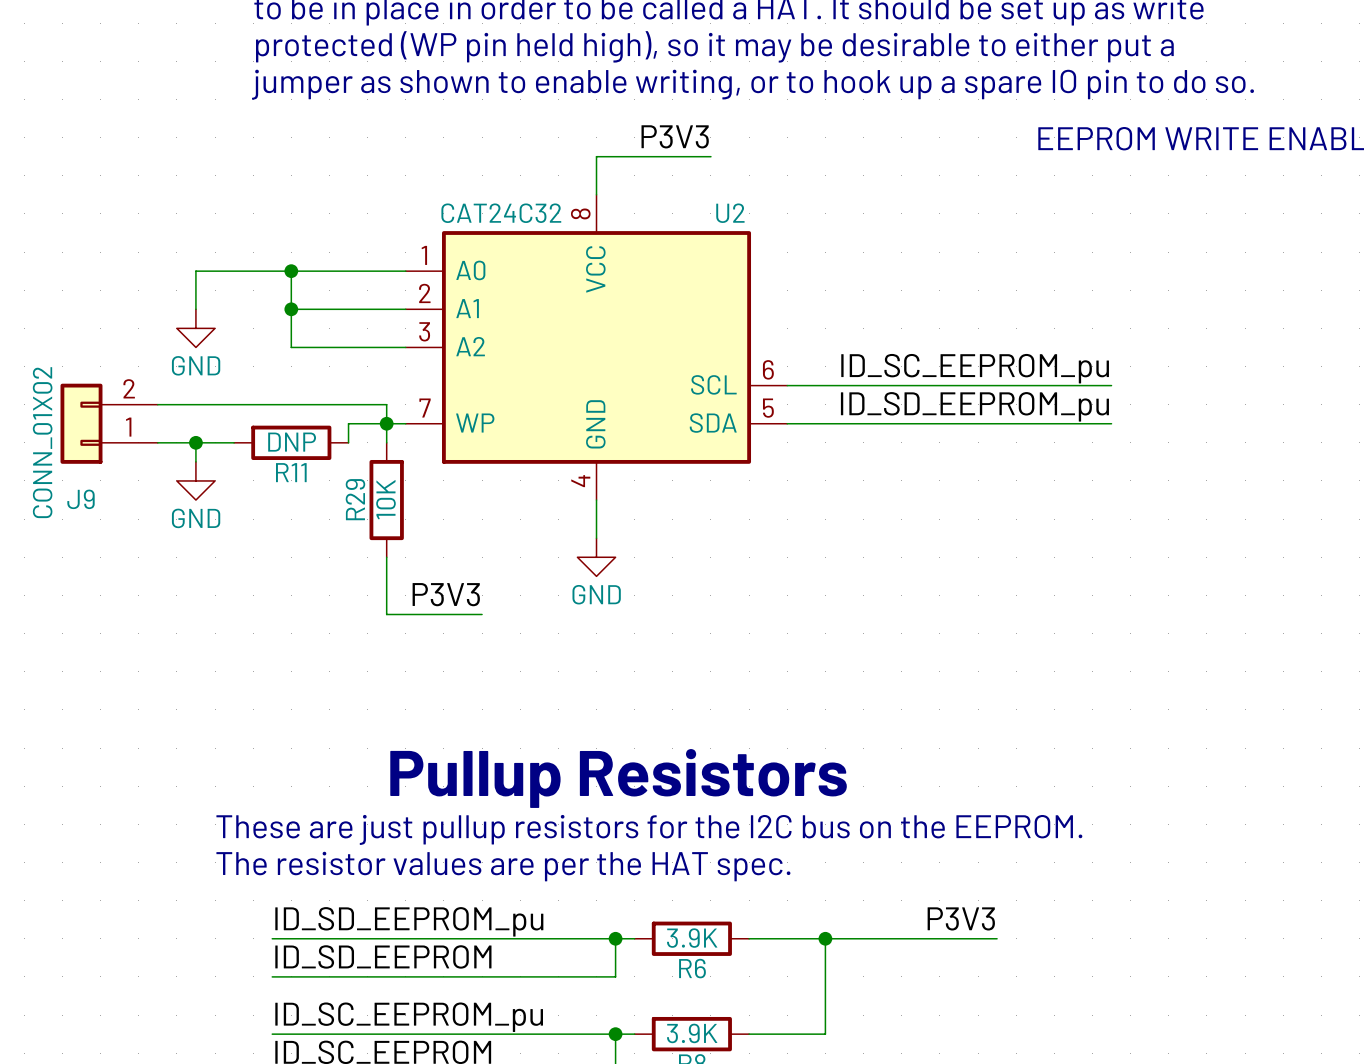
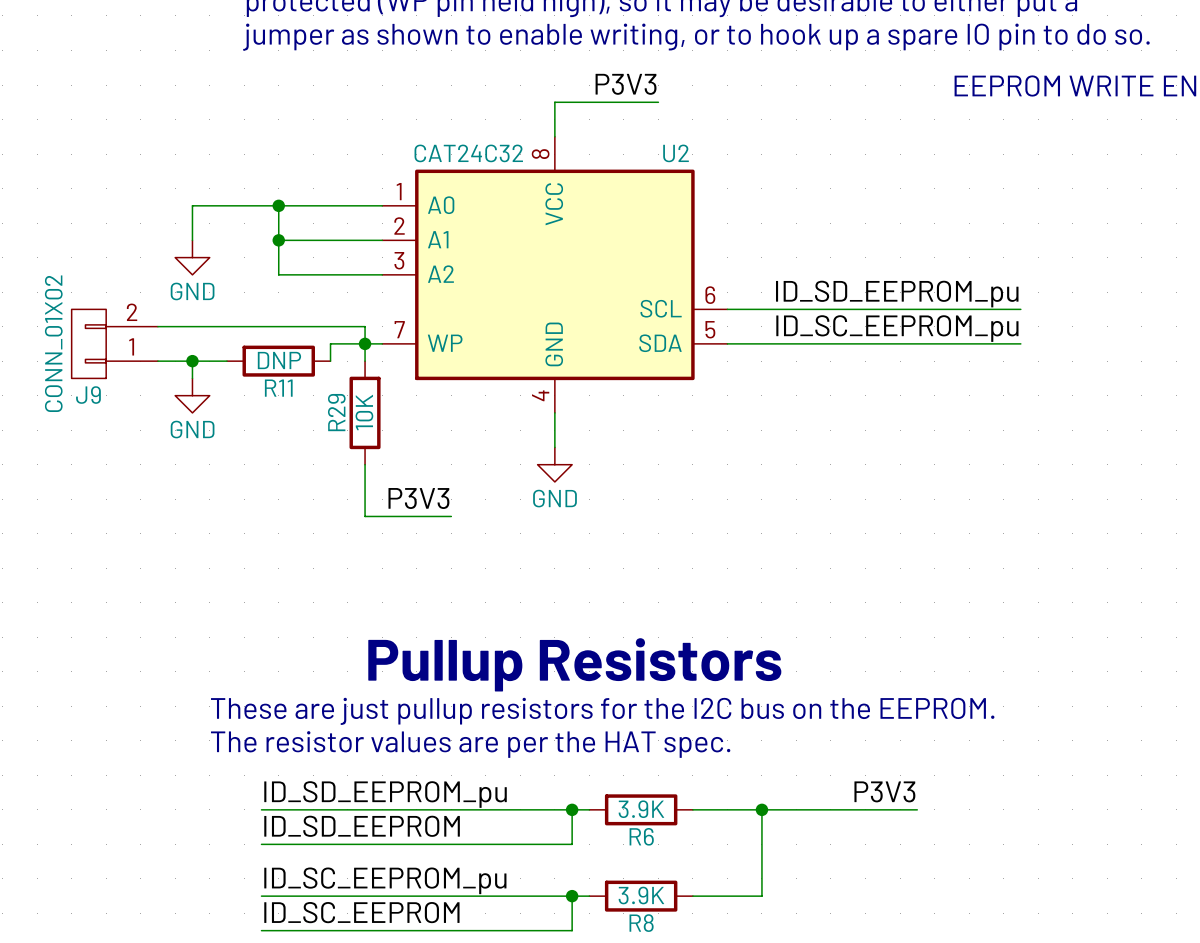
label: ID_SC_EEPROM_pu (975, 368) -> ID_SD_EEPROM_pu (897, 294)
J9 symbol: [60, 383, 158, 464] -> [71, 309, 158, 379]
label: ID_SD_EEPROM_pu (974, 406) -> ID_SC_EEPROM_pu (897, 328)

